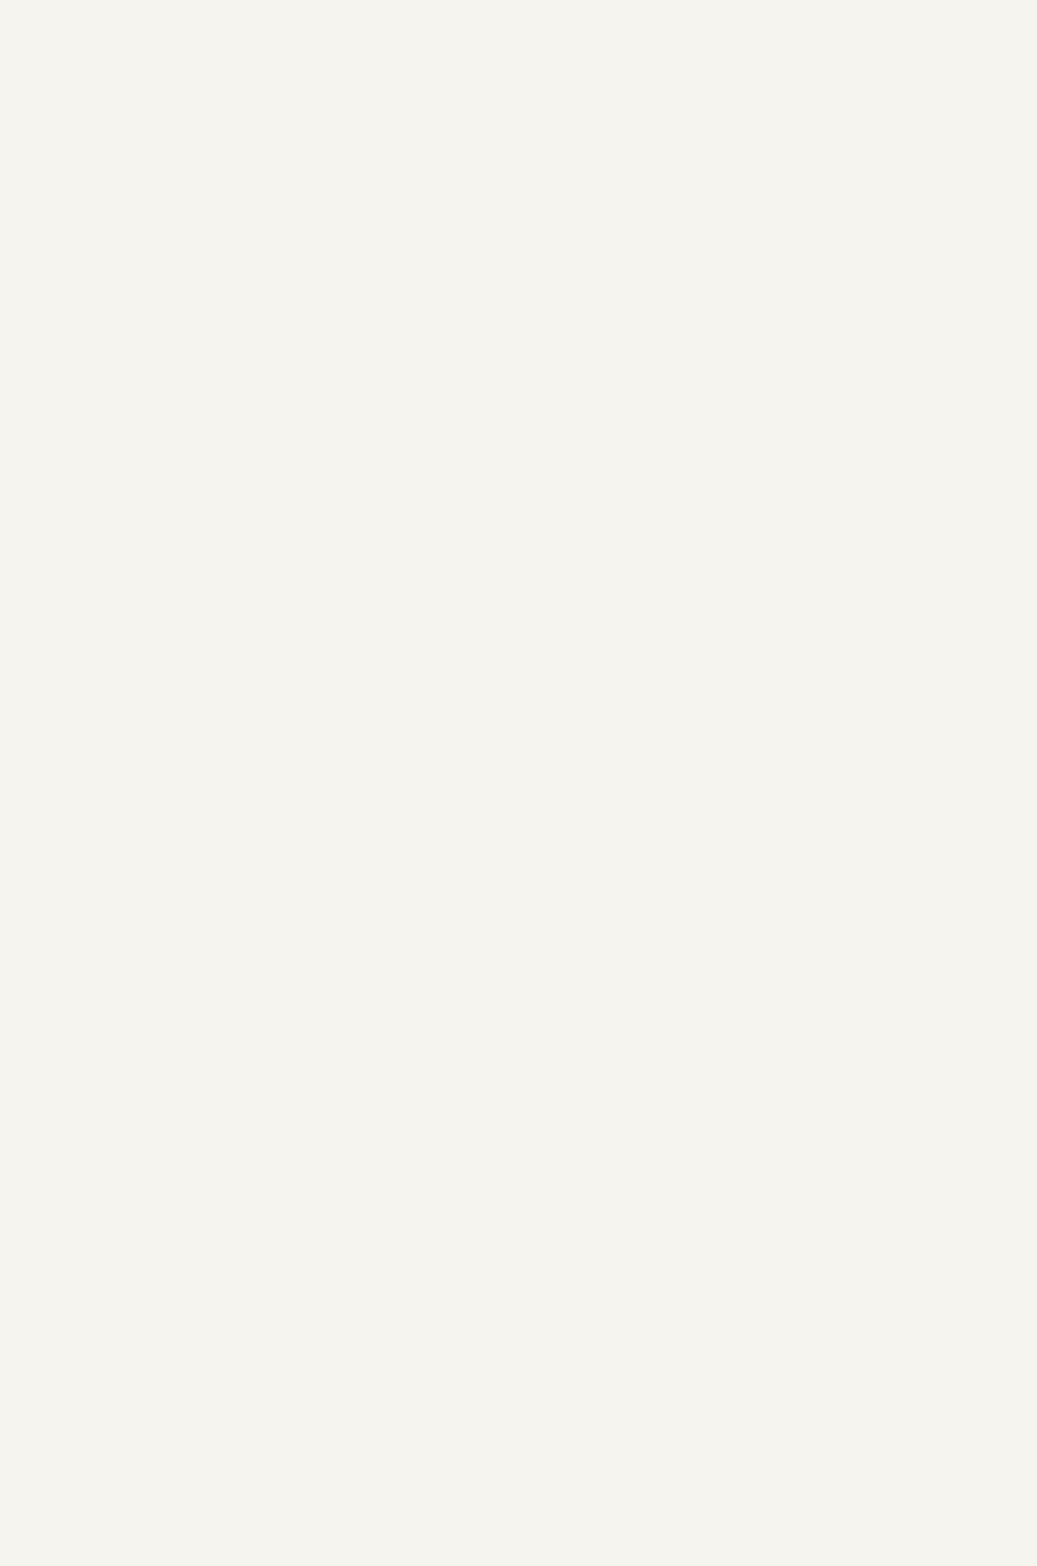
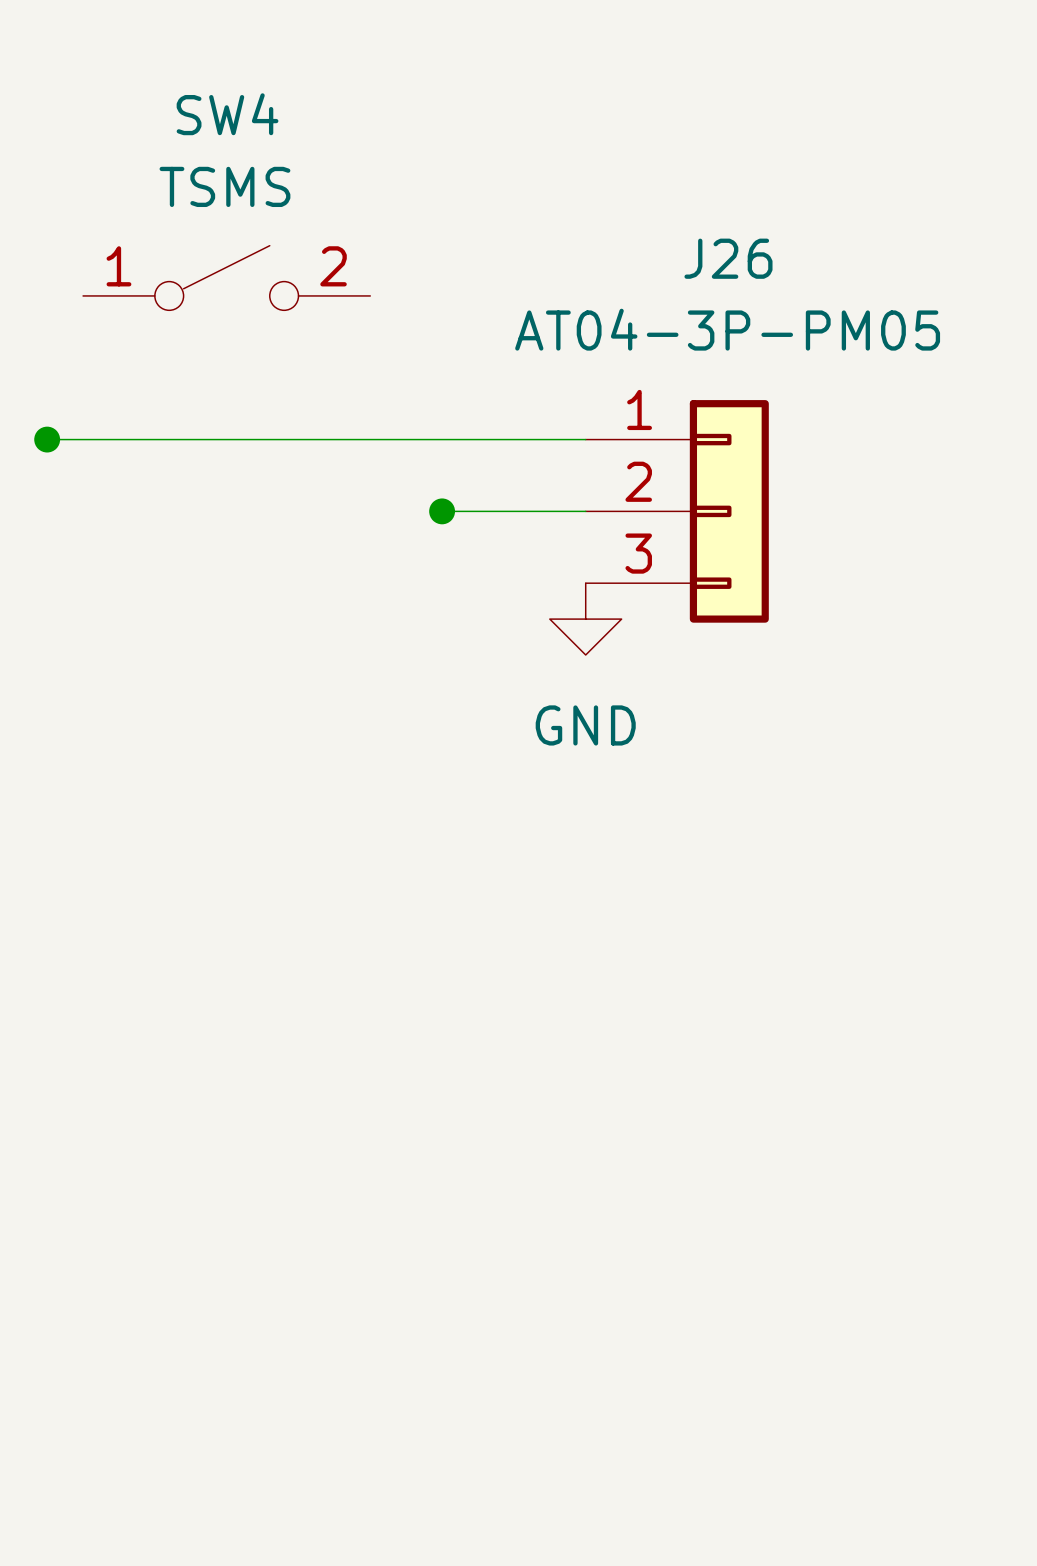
SW4: none -> TSMS (226, 278)
wire: none -> (47, 439) (585, 439)
junction: none -> (47, 439)
wire: none -> (442, 511) (585, 511)
junction: none -> (442, 511)
J26: none -> AT04-3P-PM05 (677, 511)
power symbol: none -> GND (585, 619)

